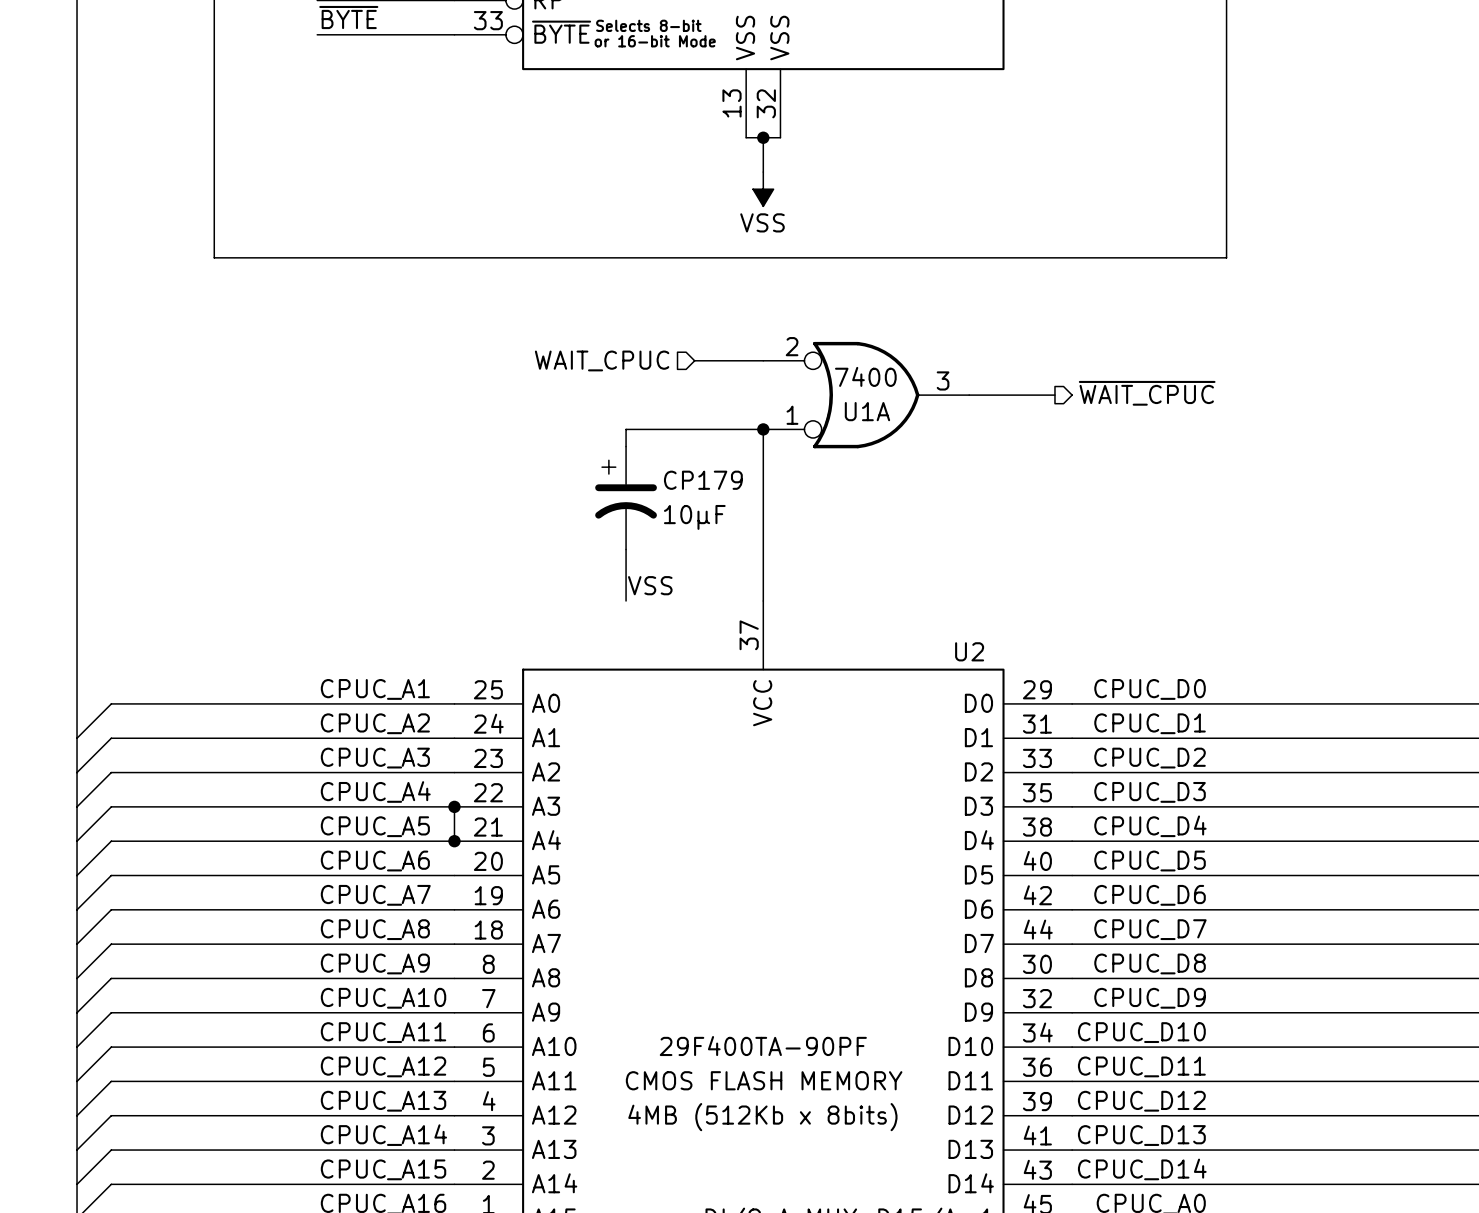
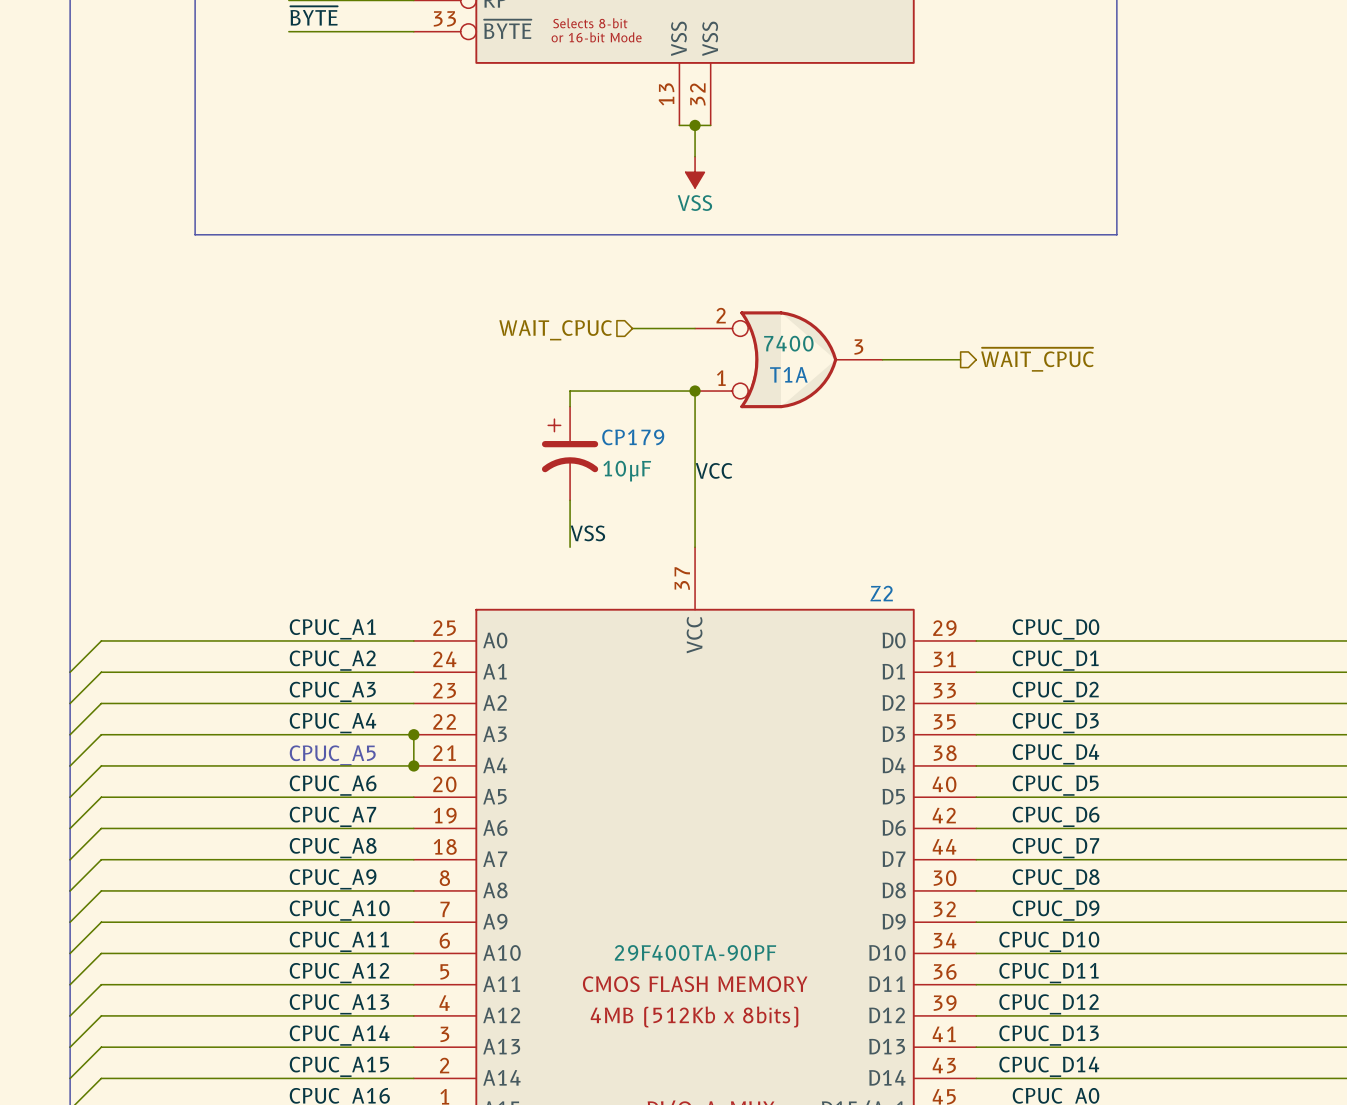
U1A name: U1A (867, 411) -> T1A (788, 374)
label: none -> VCC (714, 470)
U2 name: U2 (969, 651) -> Z2 (881, 593)
label: CPUC_A5 (375, 826) -> none
text: none -> CPUC_A5 (332, 755)

